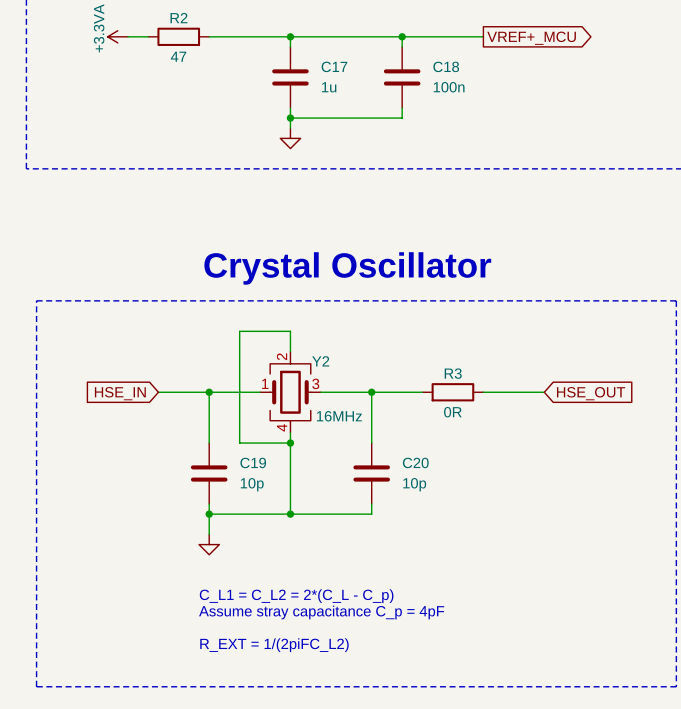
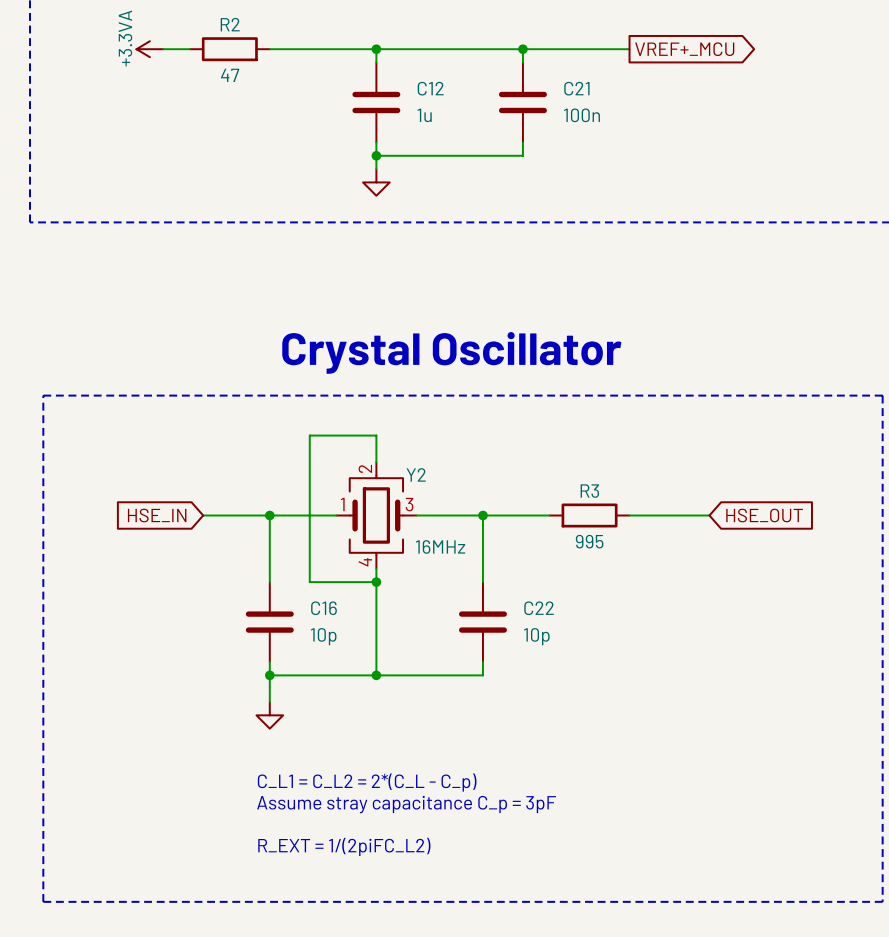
C17 name: C17 (334, 66) -> C12 (430, 88)
C18 name: C18 (446, 66) -> C21 (576, 88)
R3 value: 0R (452, 412) -> 995 (589, 541)
C19 name: C19 (253, 462) -> C16 (323, 608)
C20 name: C20 (415, 462) -> C22 (539, 608)
text: Assume stray capacitance C_p = 4pF (321, 612) -> Assume stray capacitance C_p = 3pF (406, 804)

